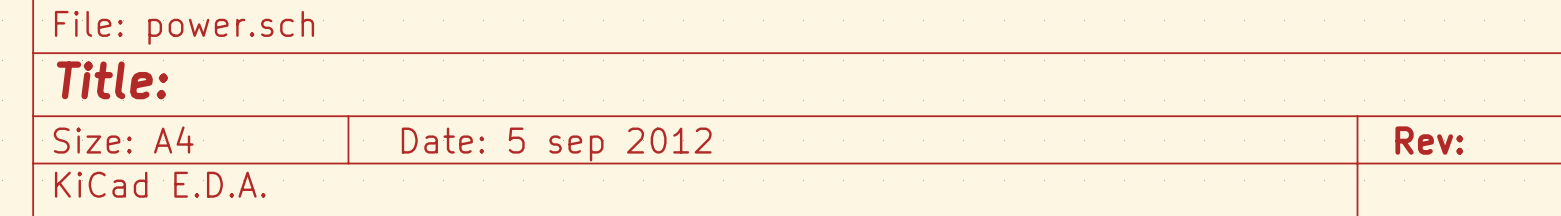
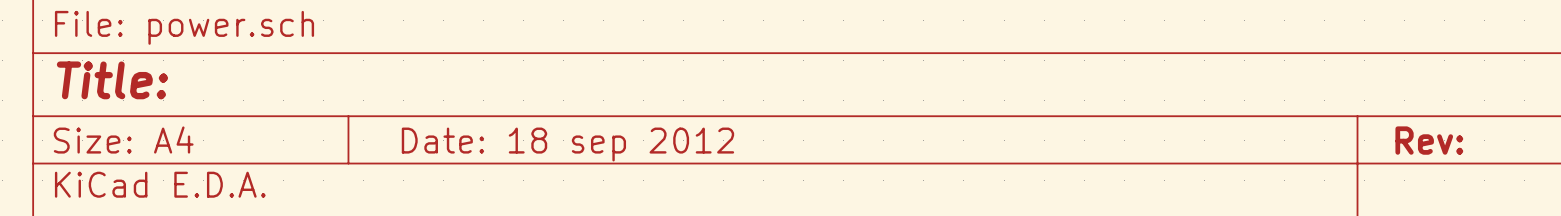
title block: Date: 5 sep 2012 (556, 144) -> Date: 18 sep 2012 (567, 144)

